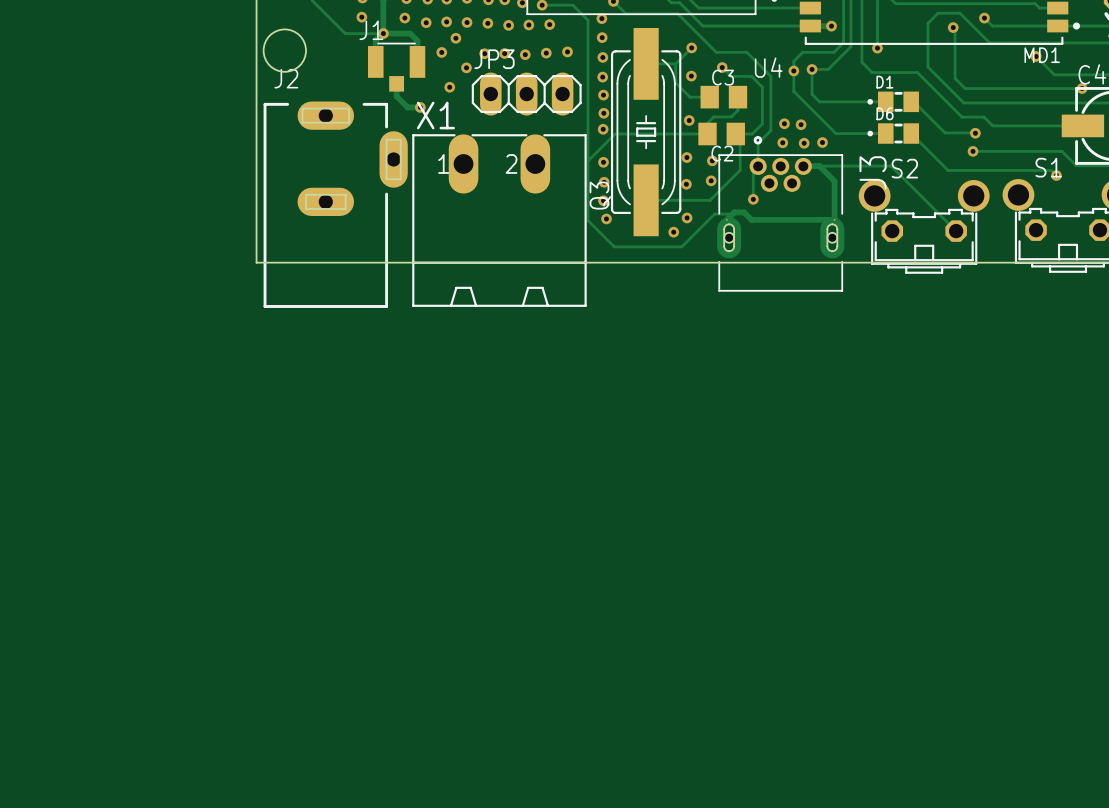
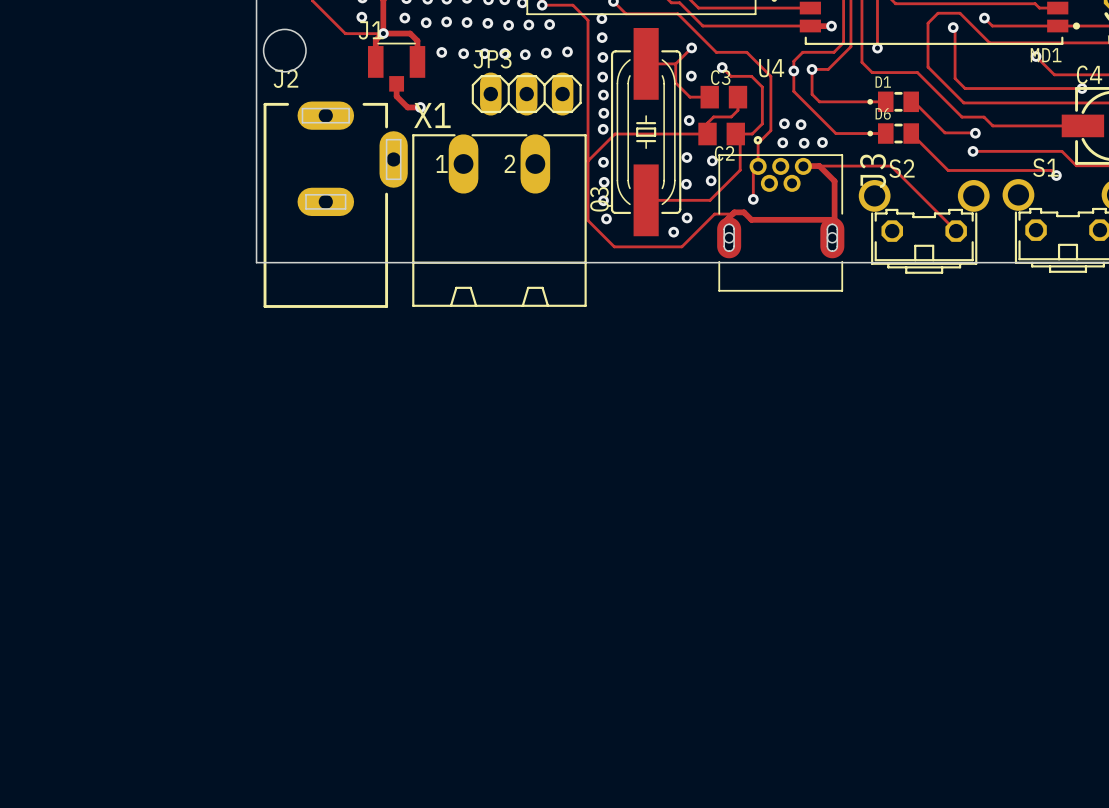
via: (455, 38) -> none
via: none -> (463, 53)
via: (466, 67) -> none
via: (449, 87) -> none

